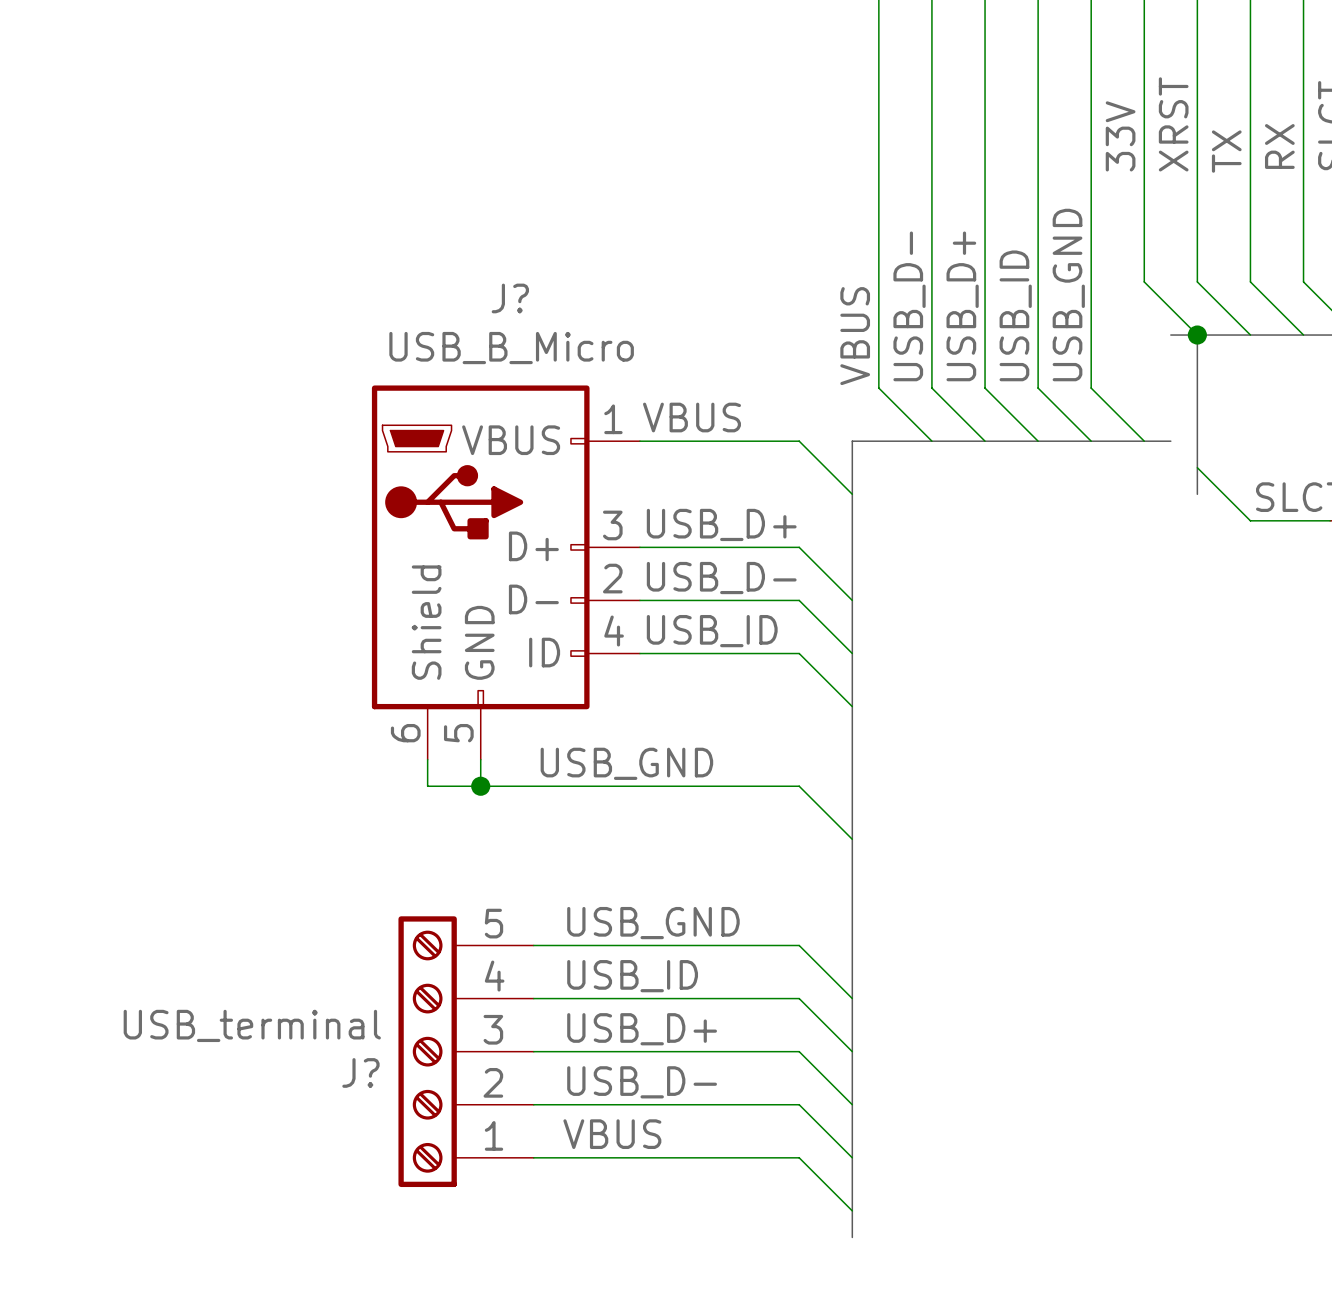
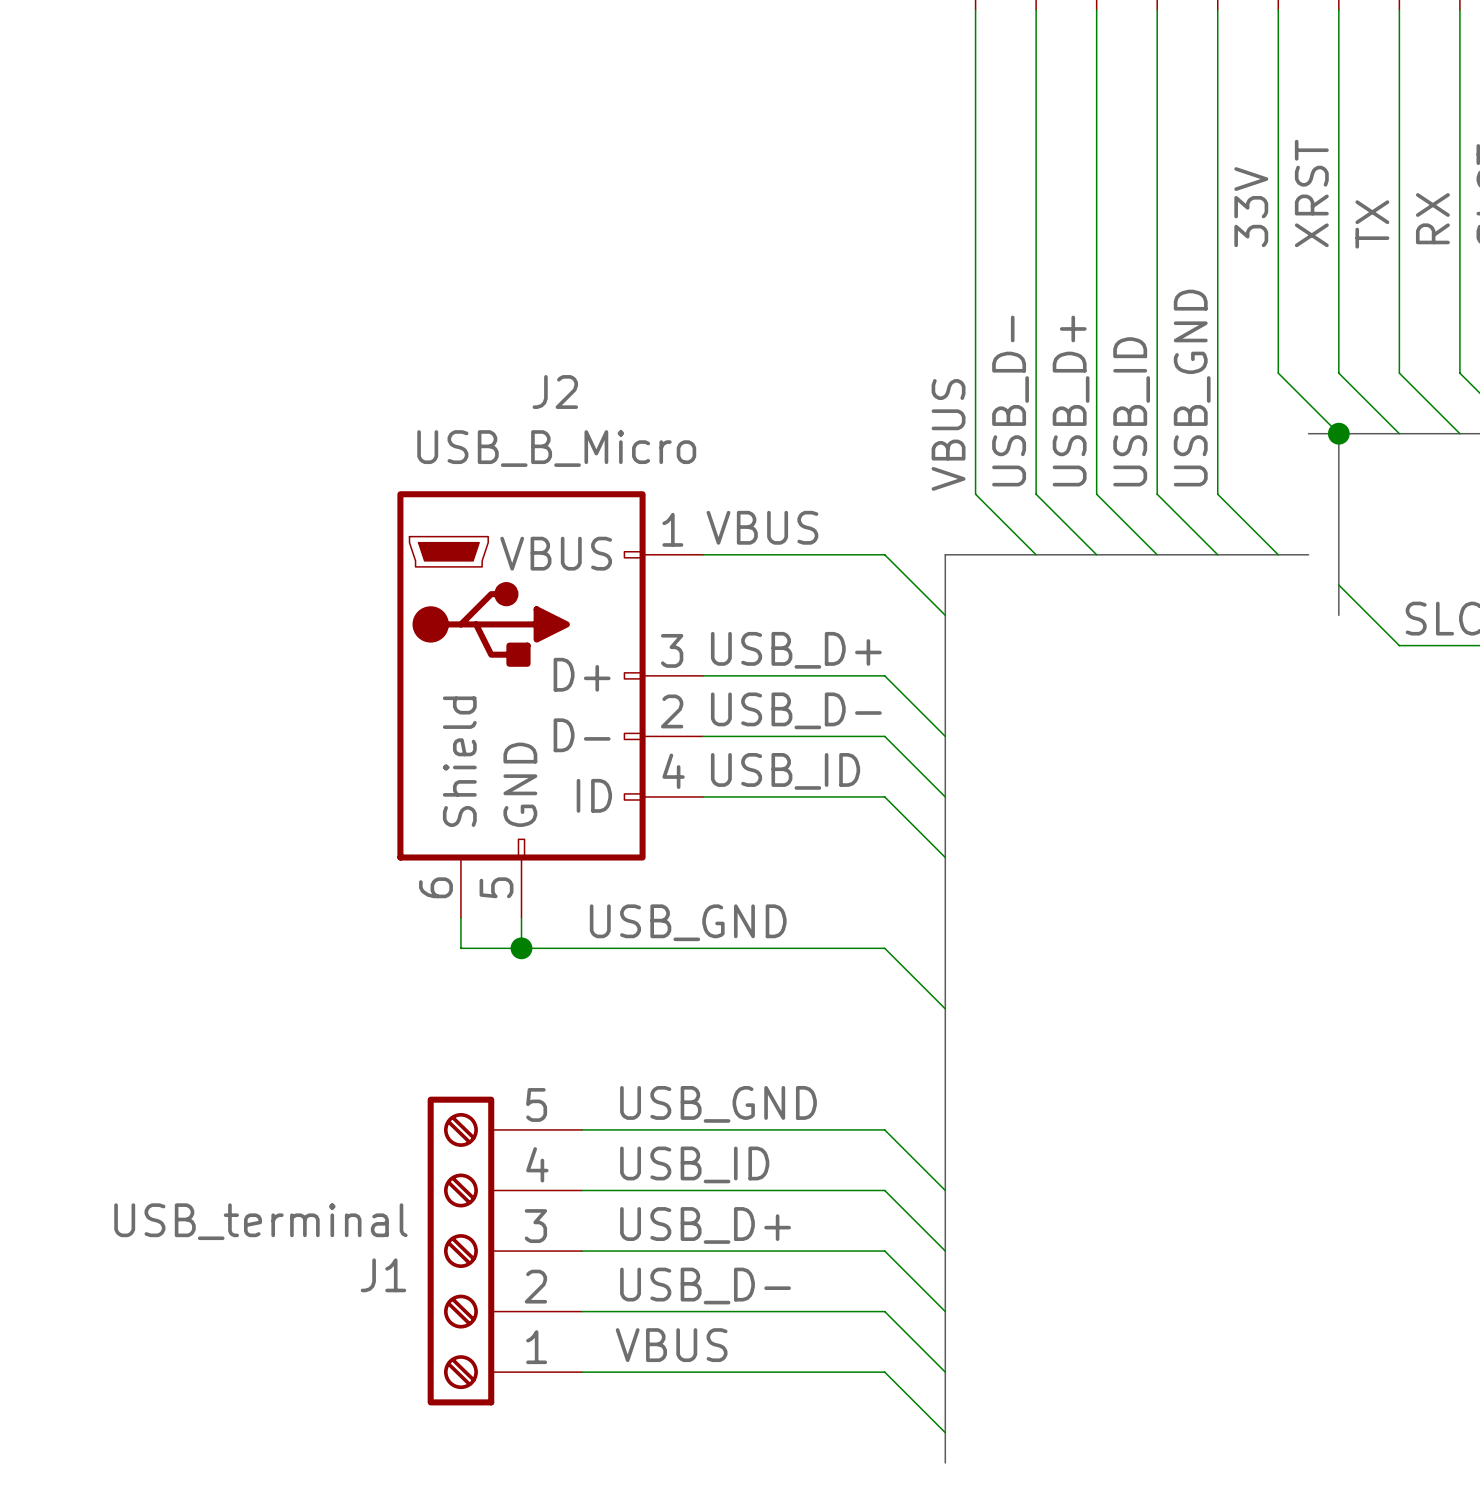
J? name: J? (510, 298) -> J2 (555, 392)
J? name: J? (360, 1072) -> J1 (383, 1275)

